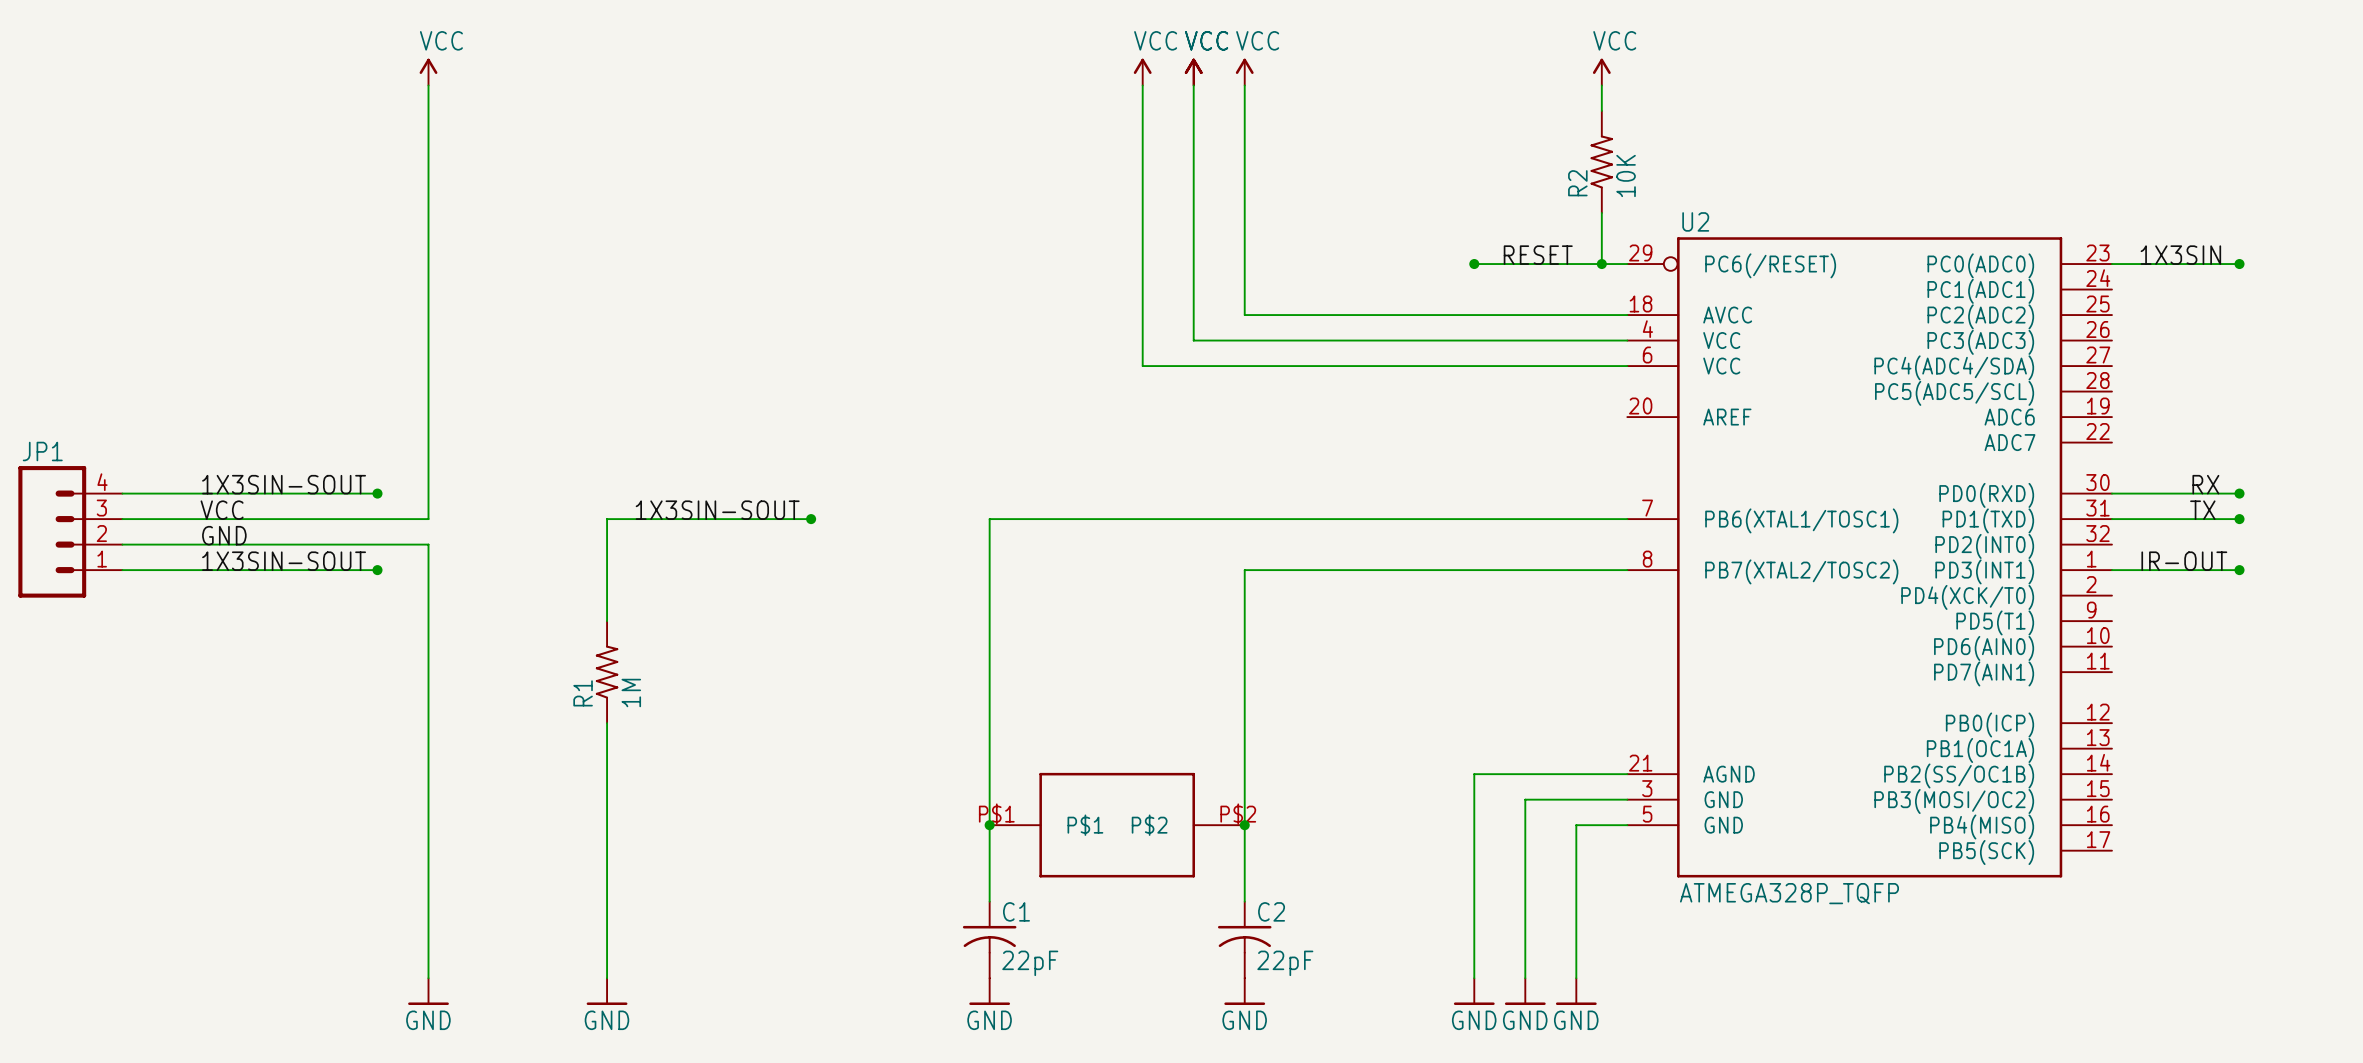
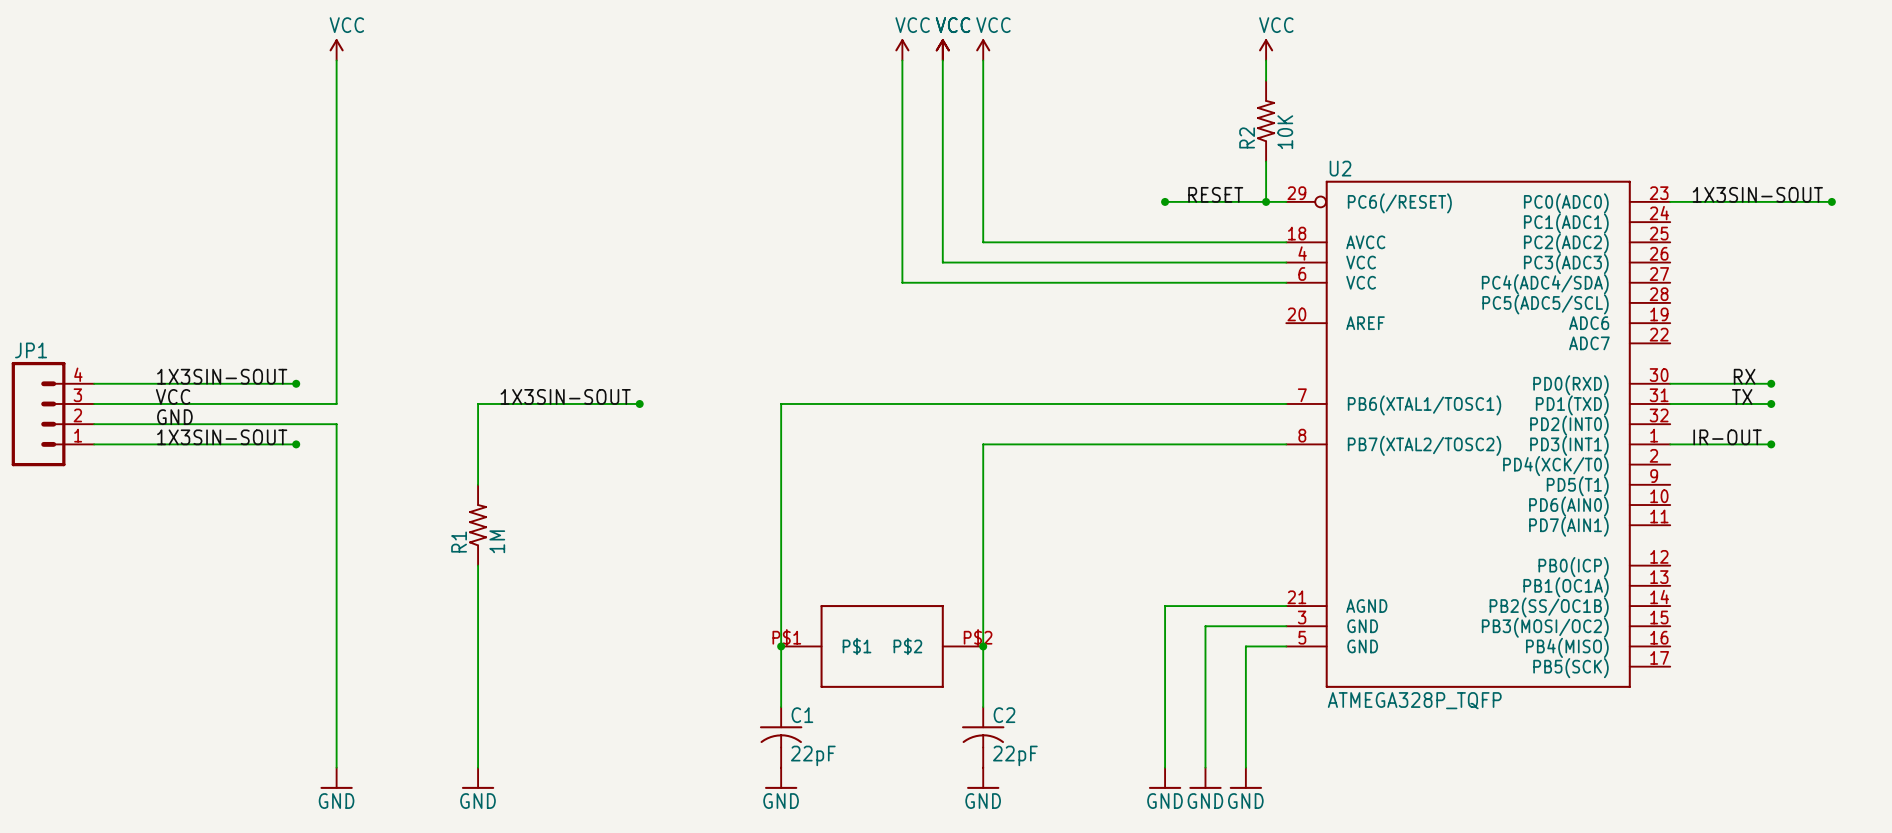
label: 1X3SIN (2180, 255) -> 1X3SIN-SOUT (1757, 194)
wire: none -> (1771, 201) (1831, 201)
junction: (2239, 264) -> none
junction: none -> (1831, 201)

